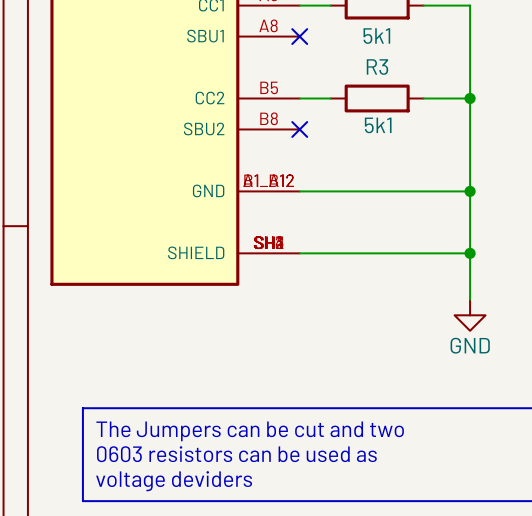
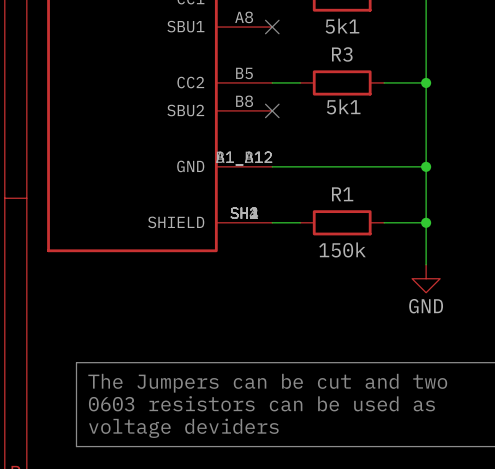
wire: (330, 253) (423, 253) -> none
R1: none -> 150k (342, 222)

